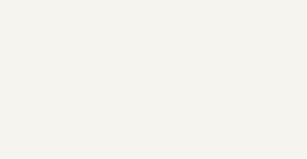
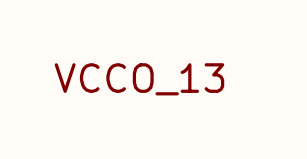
label: none -> VCCO_13 (139, 79)

